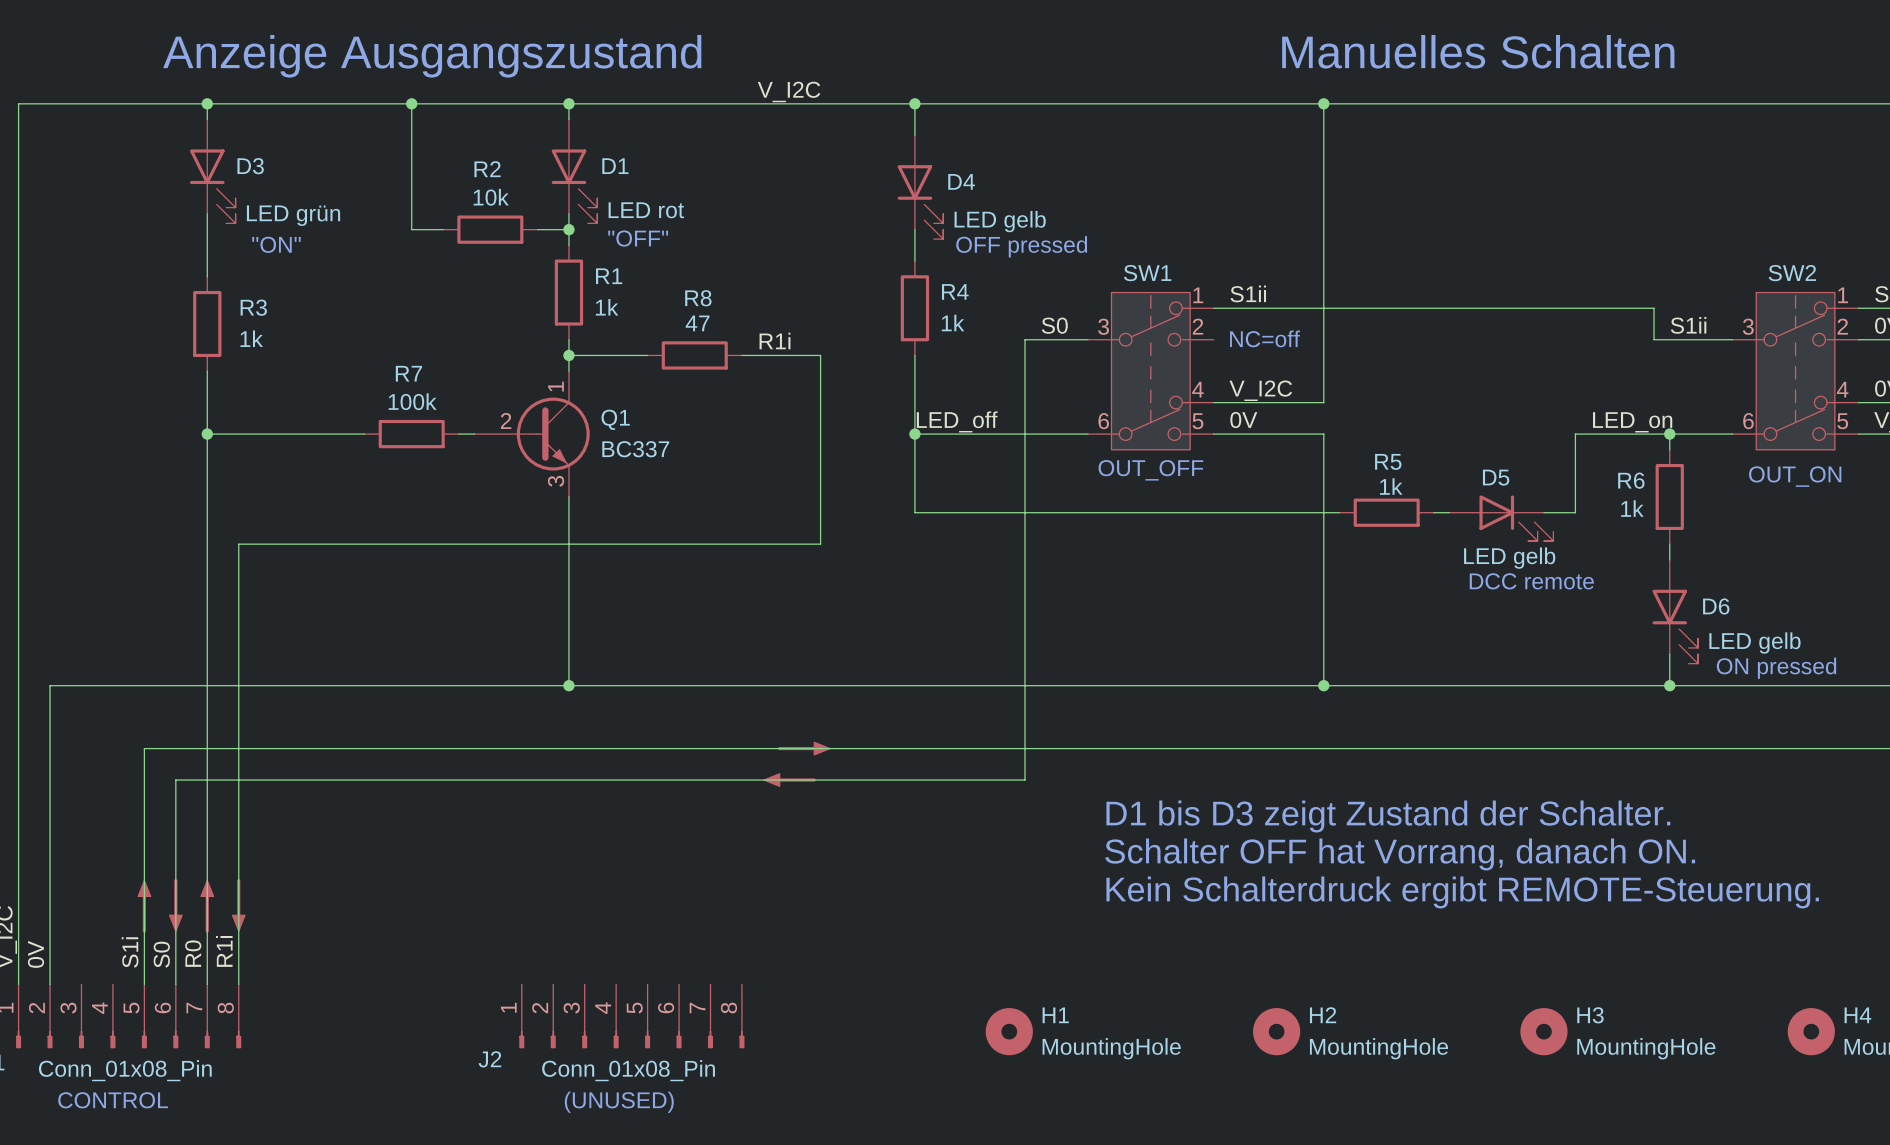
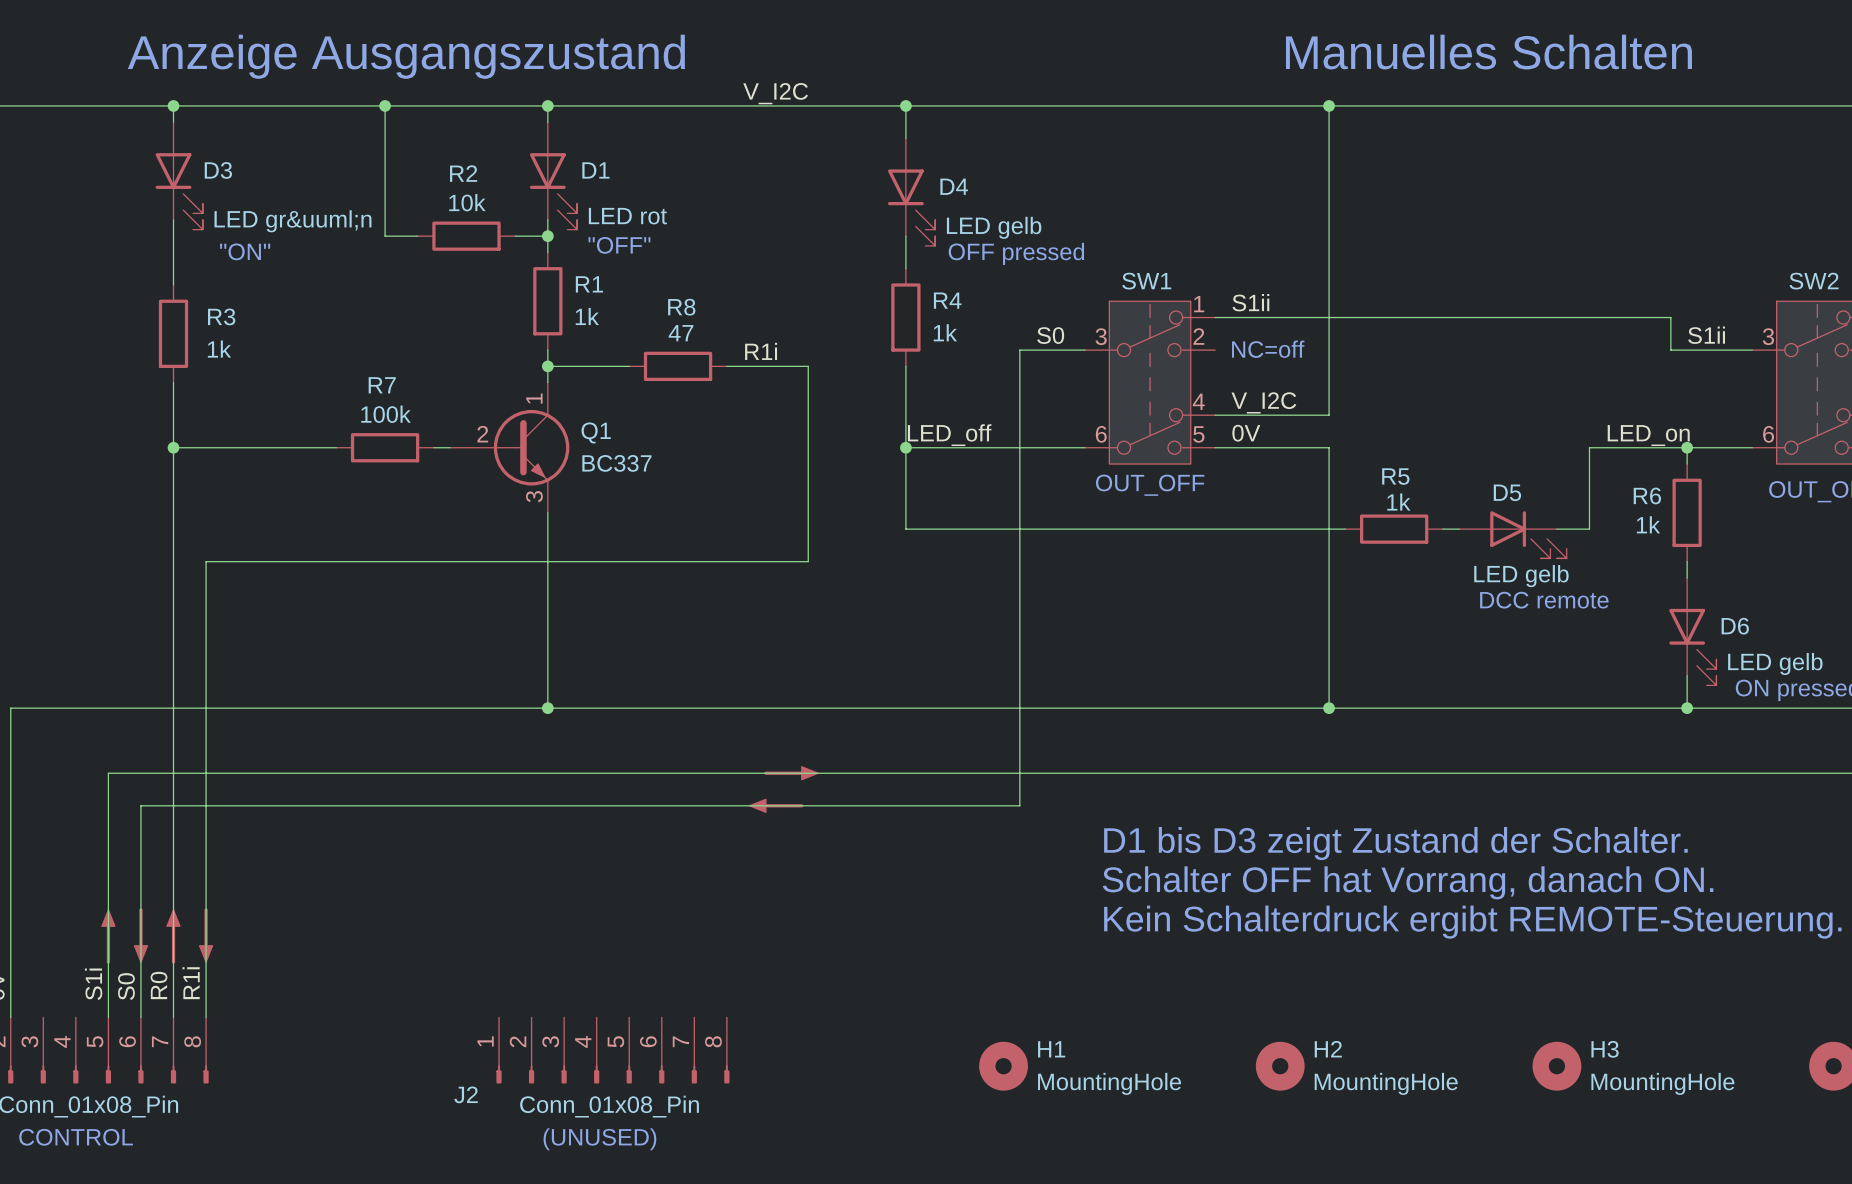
D3 value: LED grün (293, 215) -> LED gr&uuml;n (292, 221)

